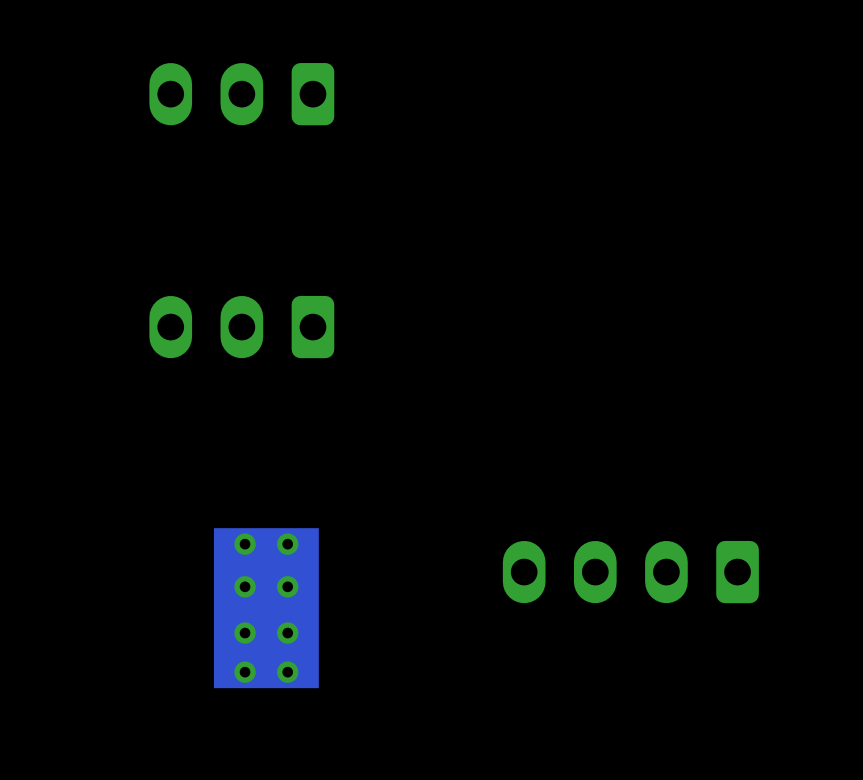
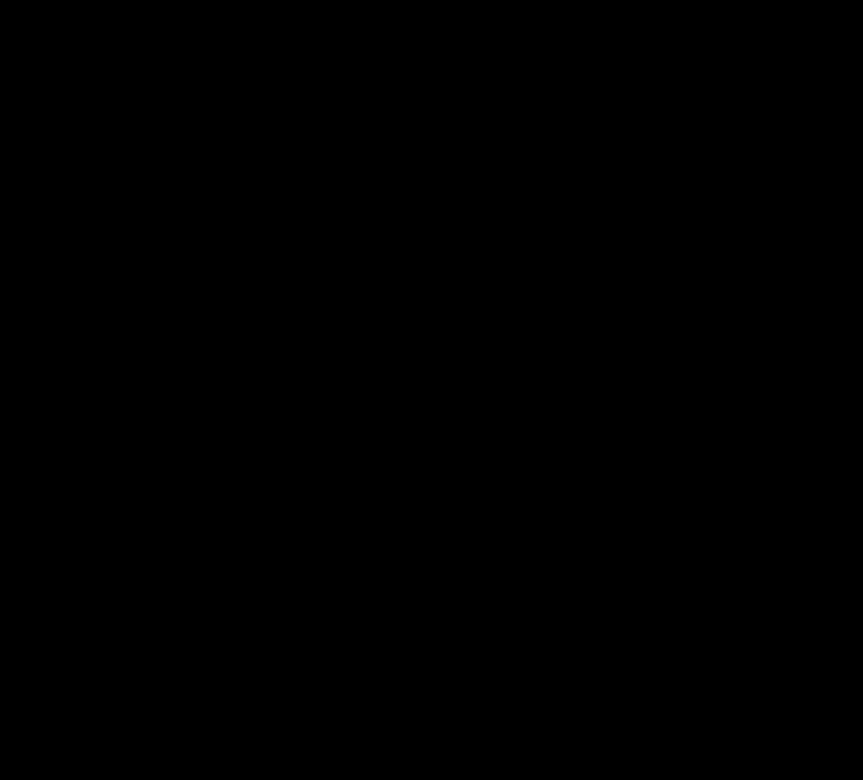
part: (241, 94) -> none
part: (241, 327) -> none
part: (630, 572) -> none
part: (266, 608) -> none

